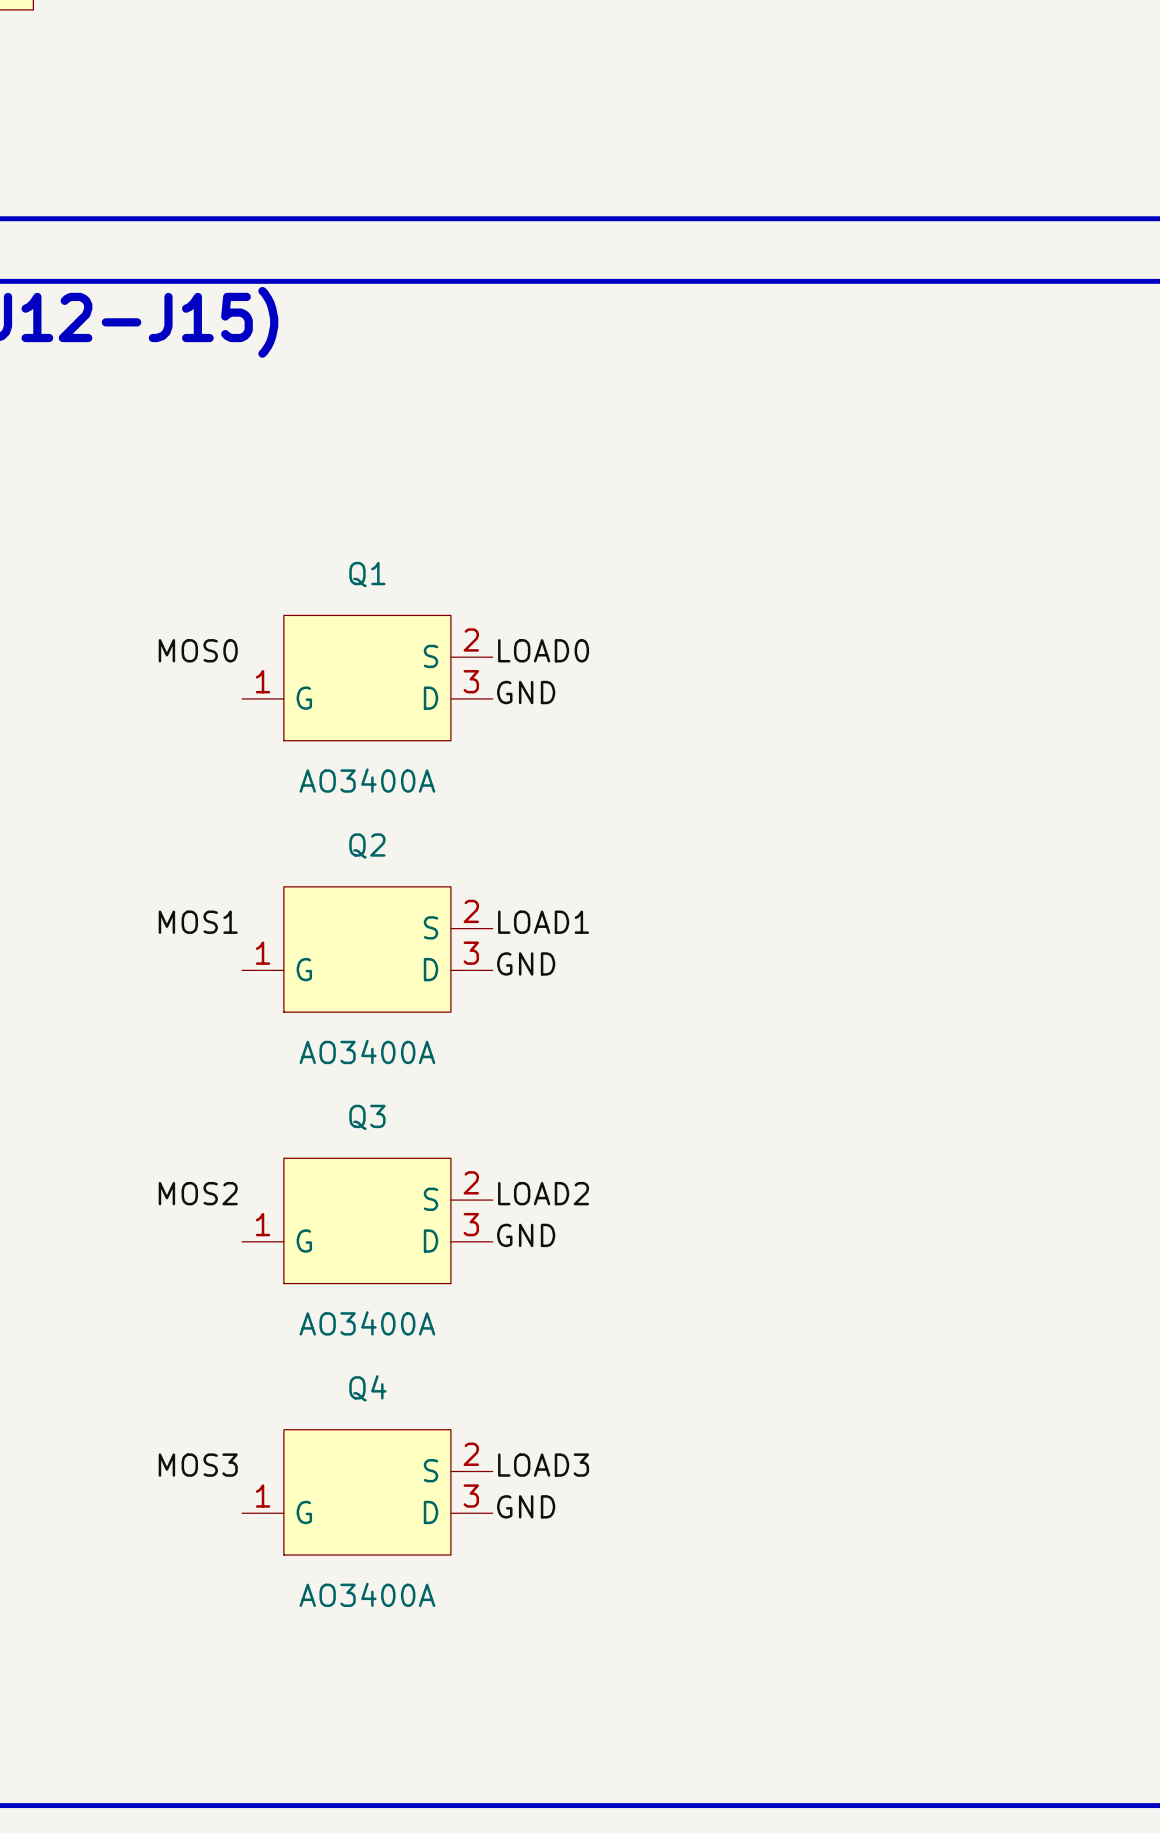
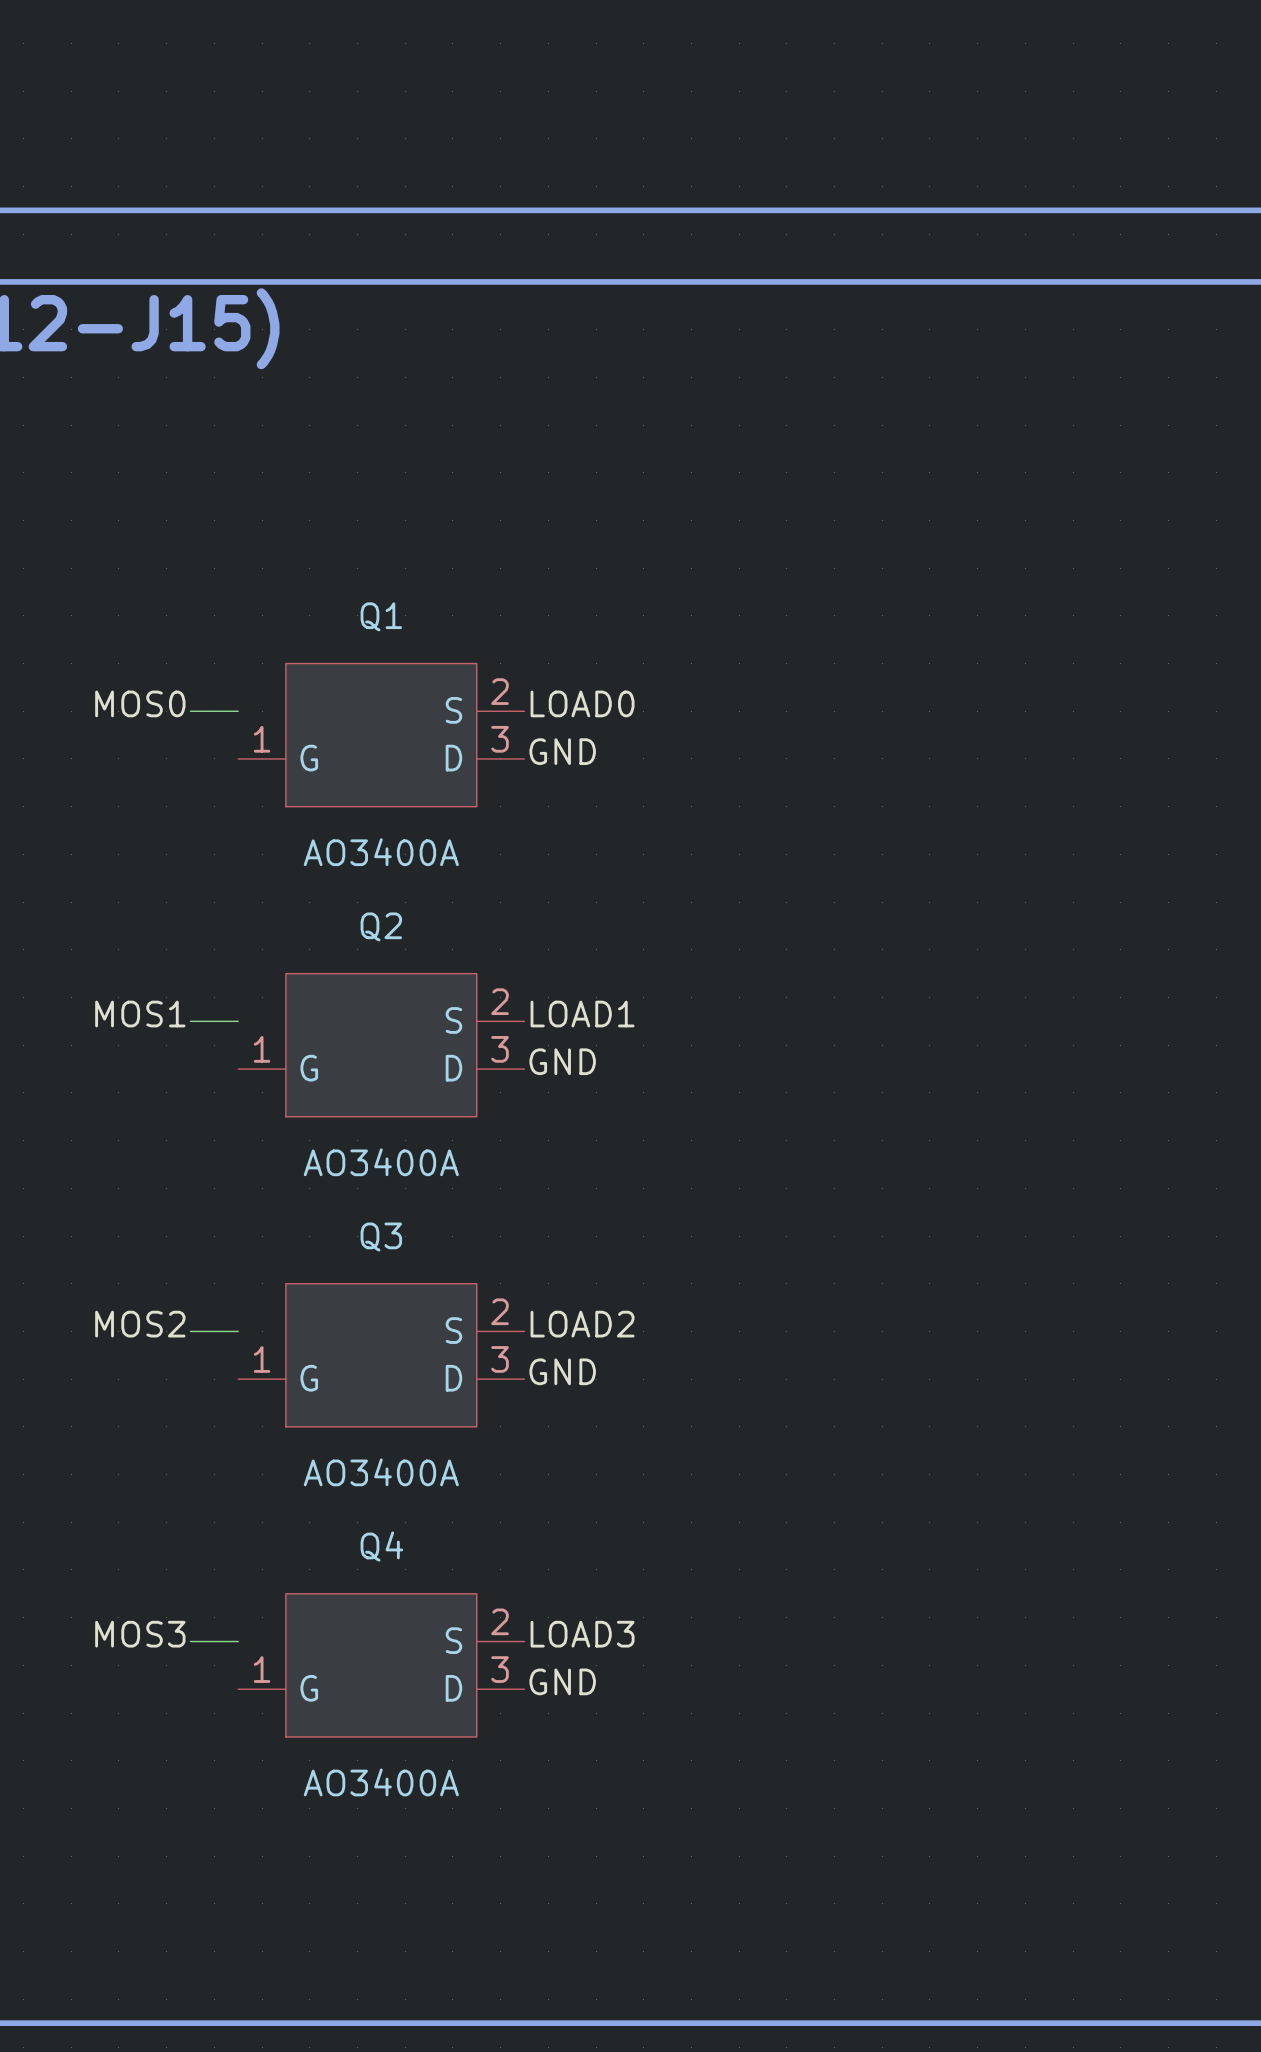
label position: MOS0 (198, 650) -> MOS0 (140, 703)
wire: none -> (190, 711) (238, 711)
label position: MOS1 (198, 922) -> MOS1 (140, 1014)
wire: none -> (190, 1021) (238, 1021)
label position: MOS2 (198, 1193) -> MOS2 (140, 1324)
wire: none -> (190, 1331) (238, 1331)
label position: MOS3 (198, 1465) -> MOS3 (140, 1634)
wire: none -> (190, 1641) (238, 1641)

